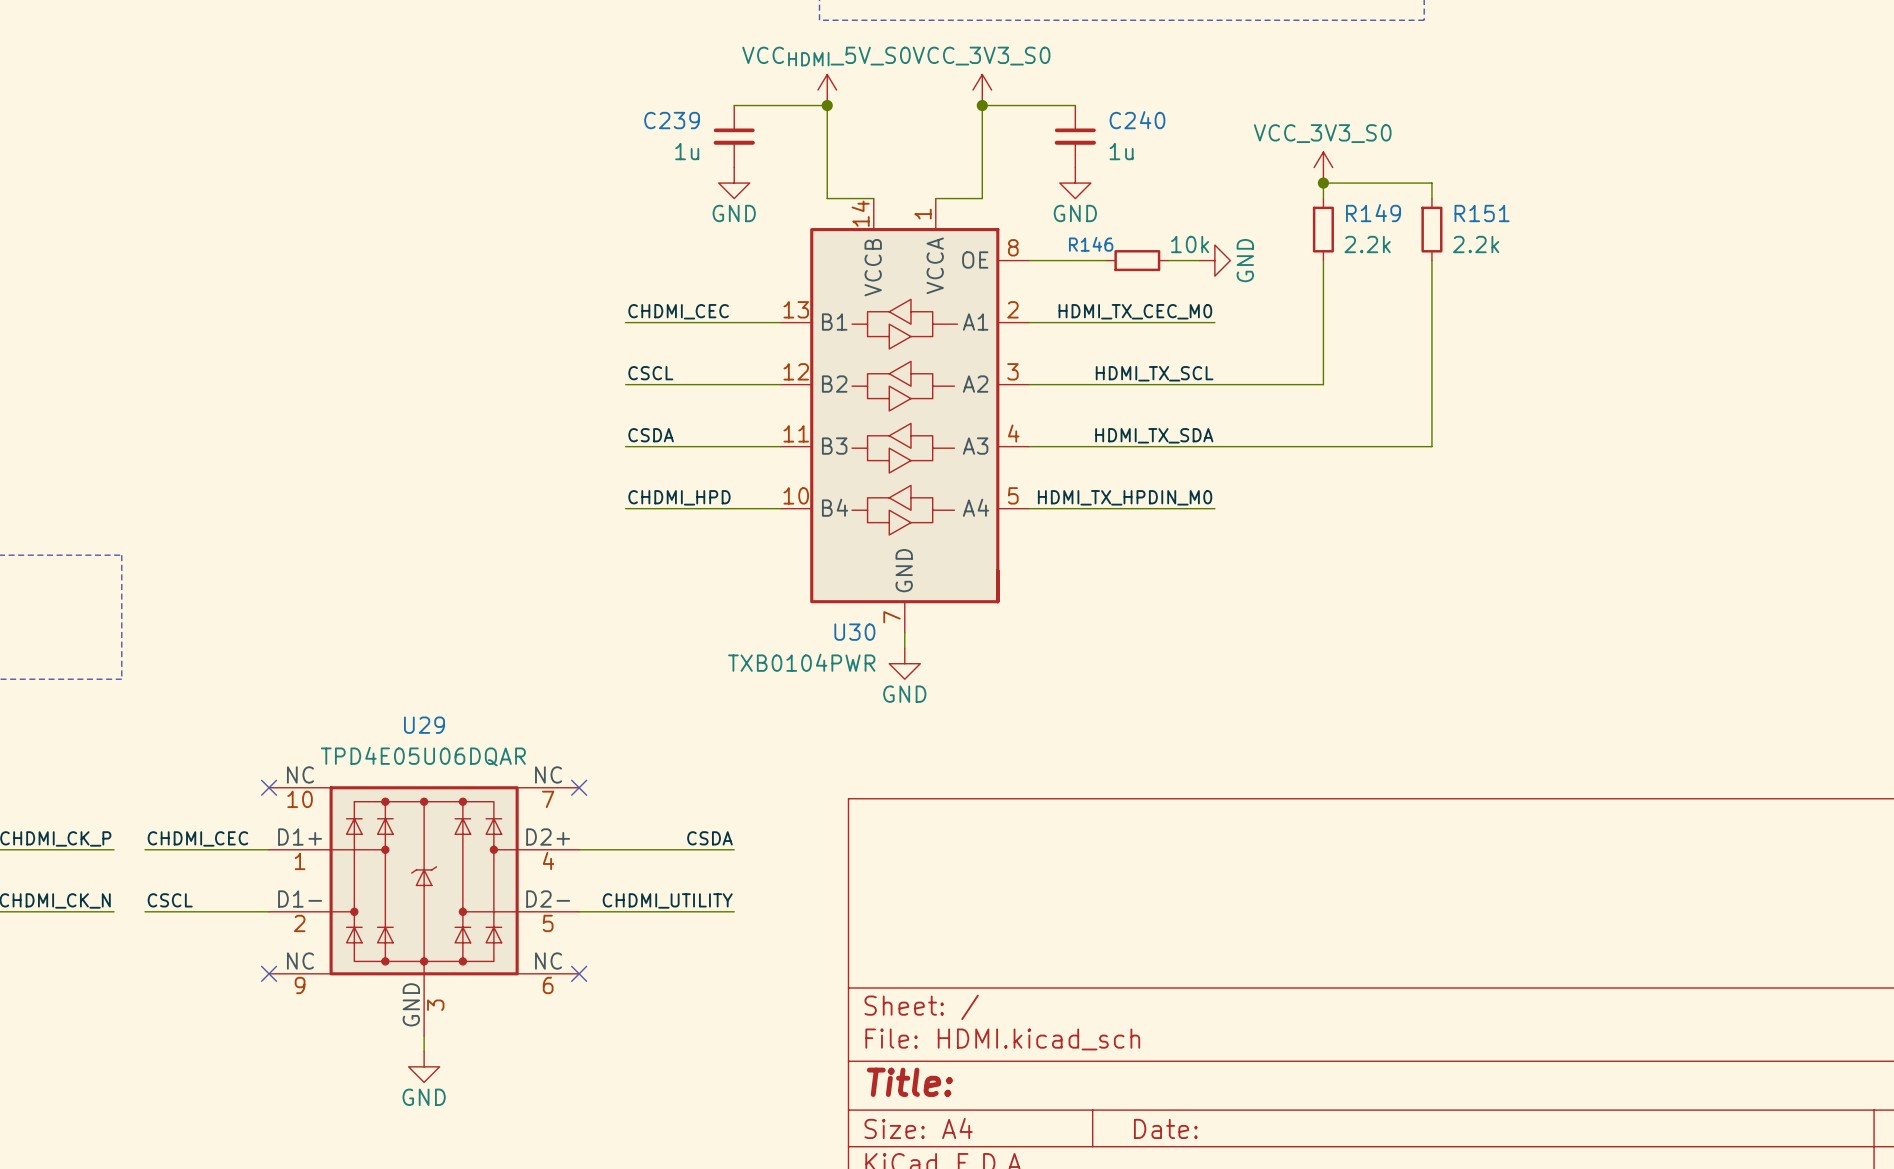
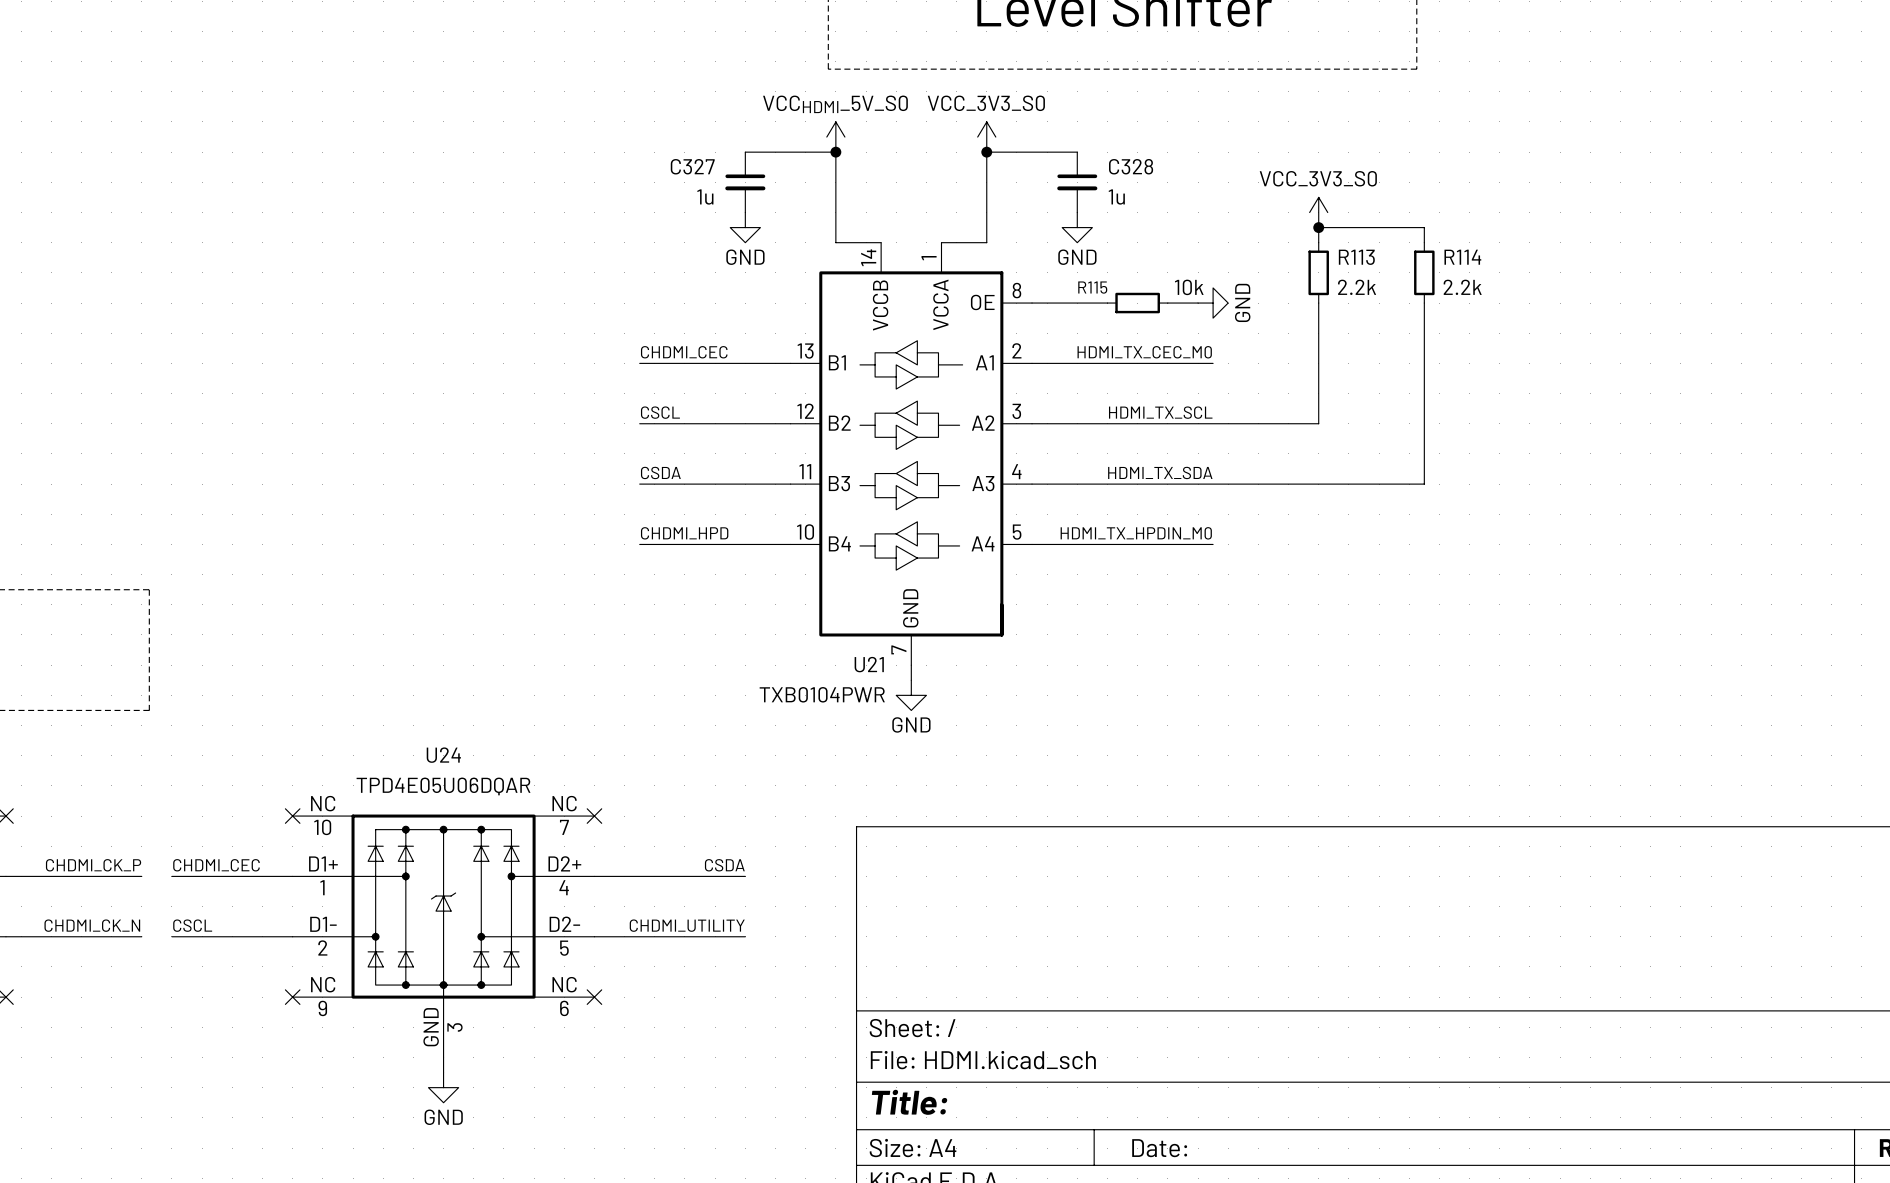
C239 name: C239 (672, 120) -> C327 (692, 166)
C240 name: C240 (1137, 120) -> C328 (1131, 166)
R149 name: R149 (1373, 213) -> R113 (1356, 257)
R151 name: R151 (1482, 213) -> R114 (1462, 257)
R146 name: R146 (1091, 244) -> R115 (1092, 287)
U30 name: U30 (854, 632) -> U21 (869, 664)
U29 name: U29 (424, 725) -> U24 (443, 755)

